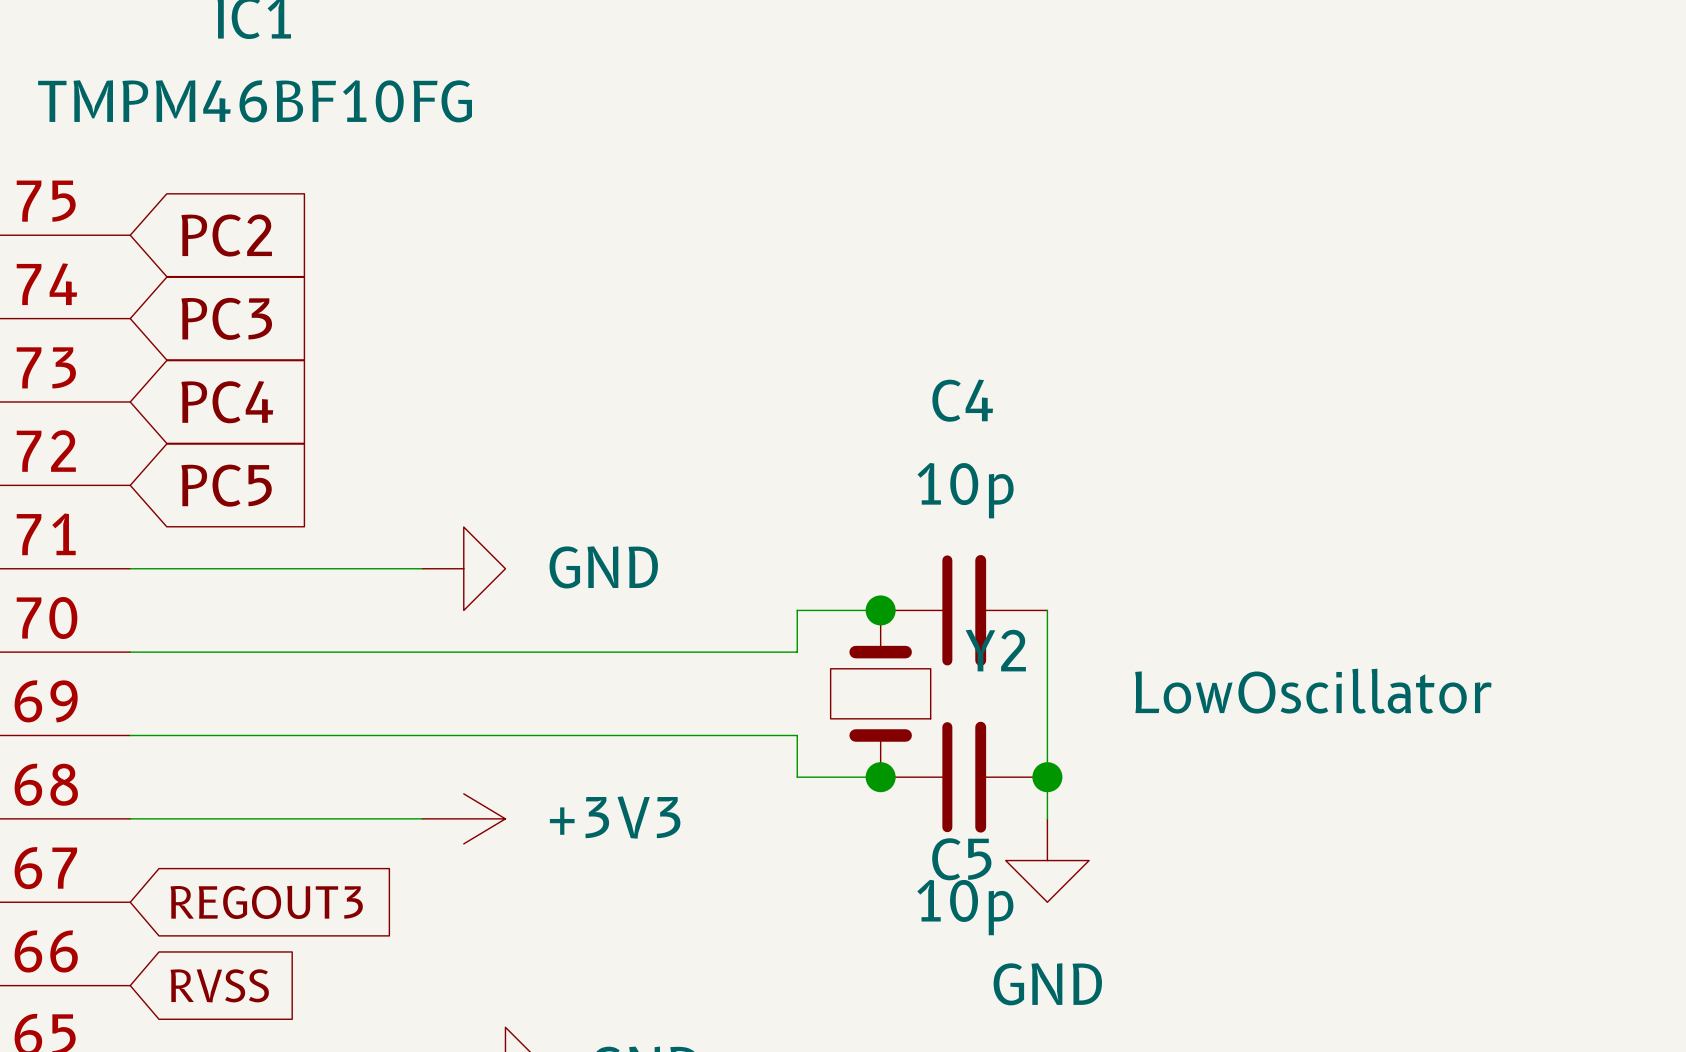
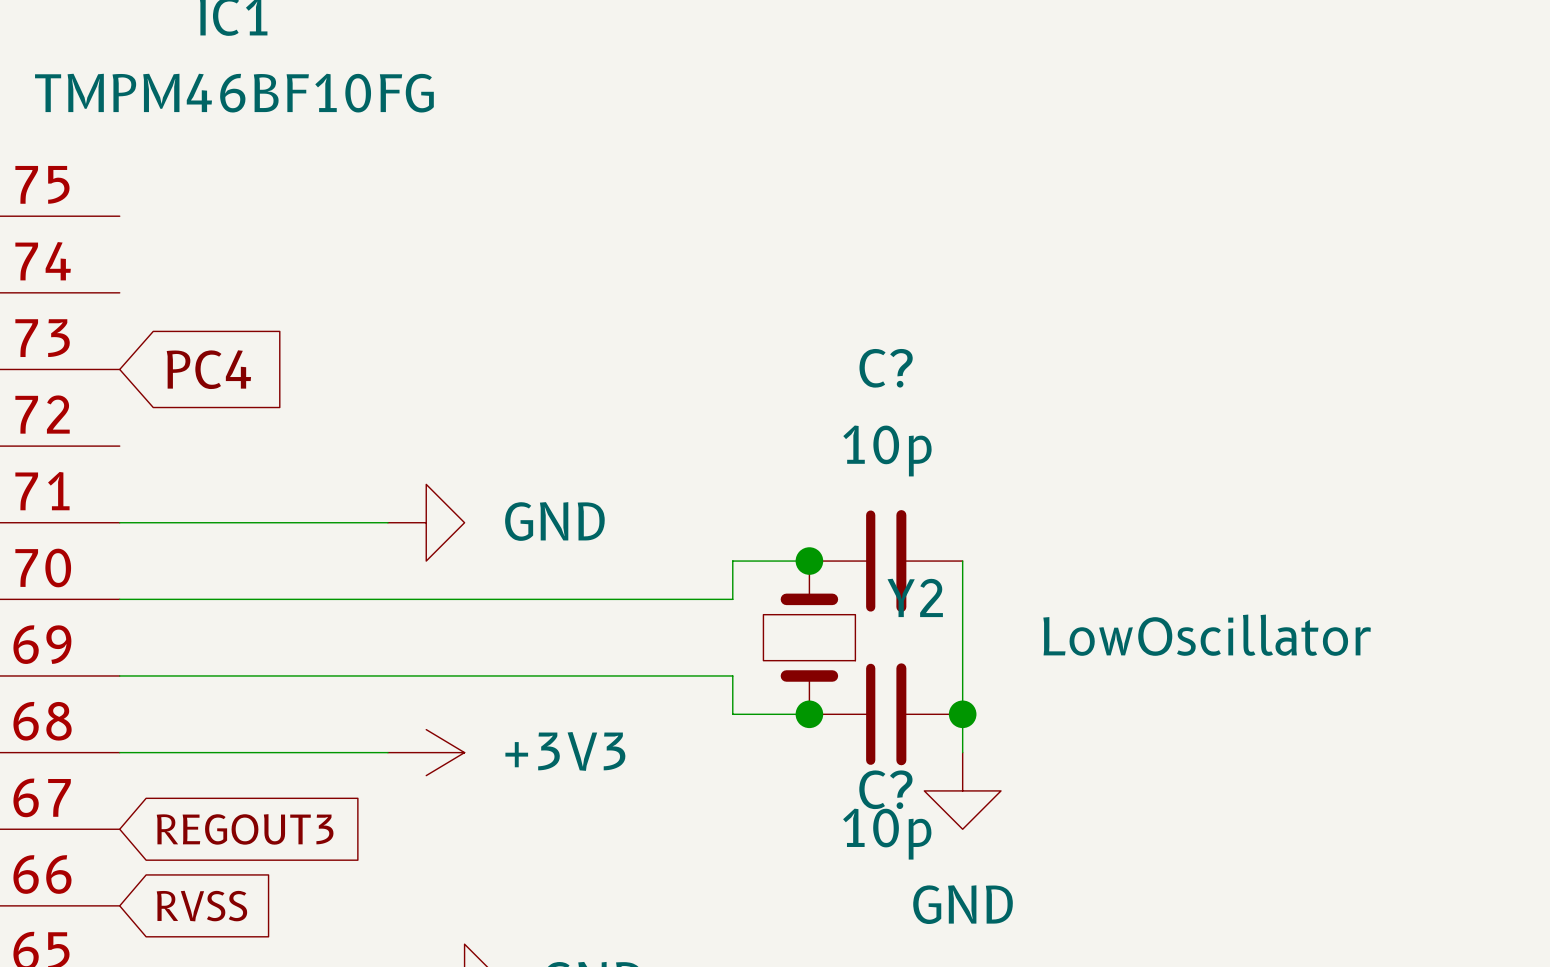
global label: PC2 (226, 235) -> none
global label: PC3 (226, 318) -> none
C4 name: C4 (962, 400) -> C? (886, 368)
global label: PC5 (226, 485) -> none
C5 name: C5 (961, 859) -> C? (885, 789)

